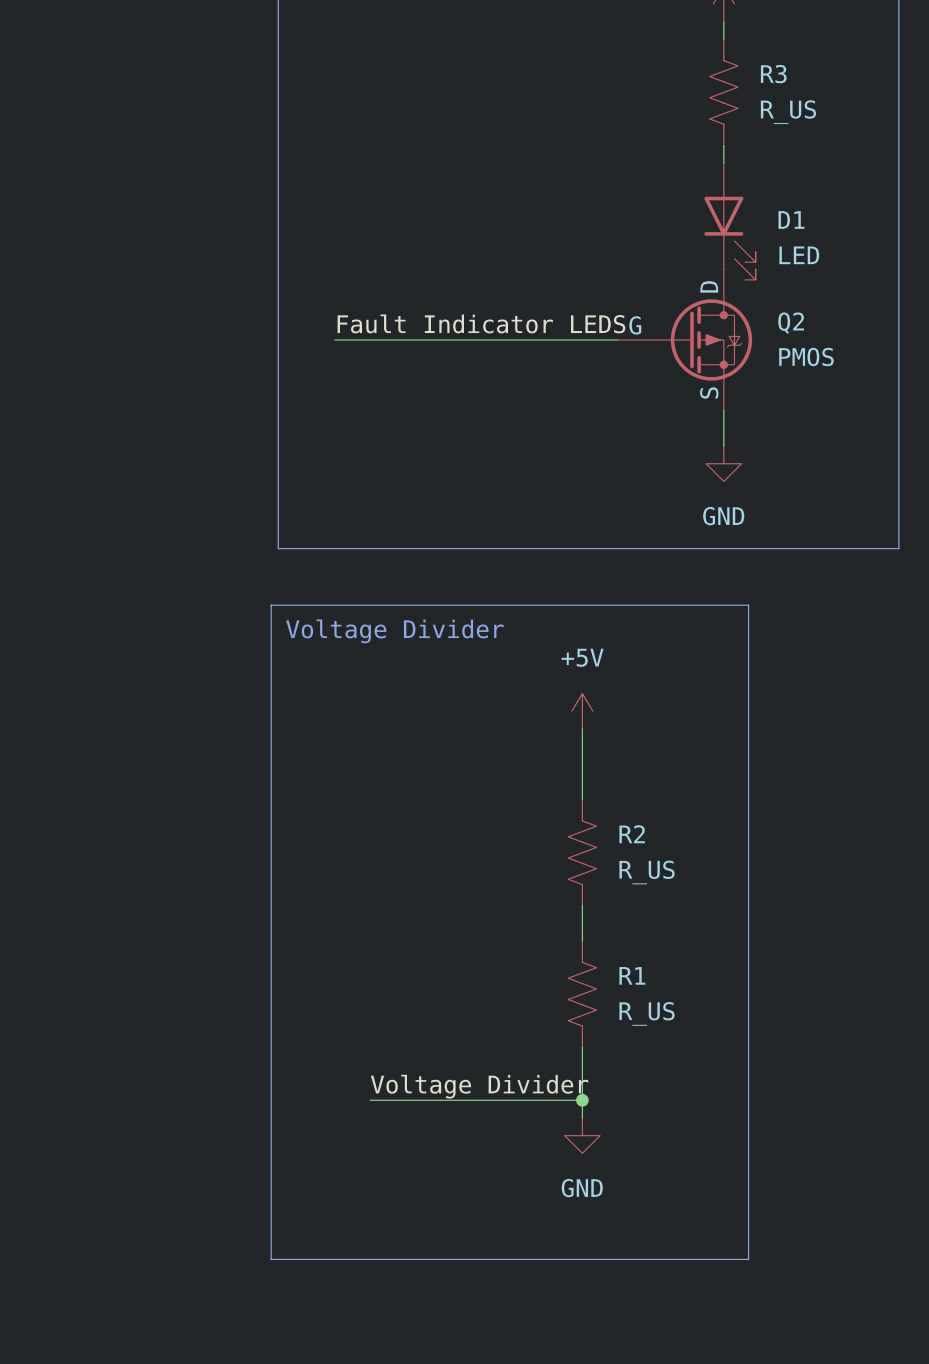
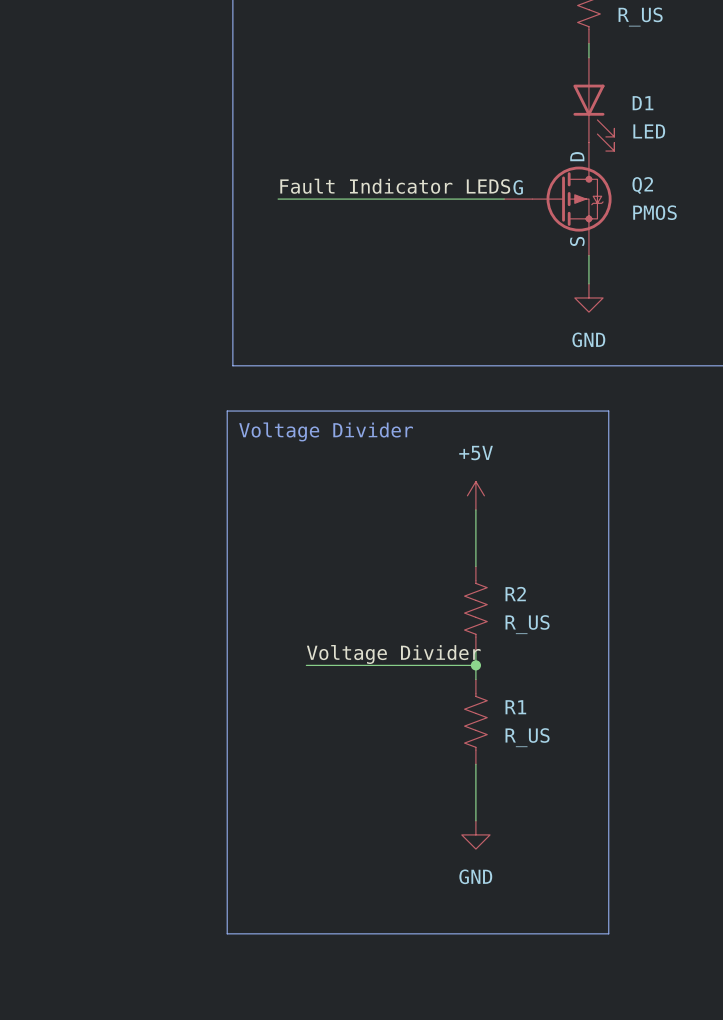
junction: none -> (475, 665)
label position: Voltage Divider (479, 1086) -> Voltage Divider (393, 654)
wire: (370, 1100) (582, 1100) -> (306, 665) (475, 665)
junction: (582, 1100) -> none

